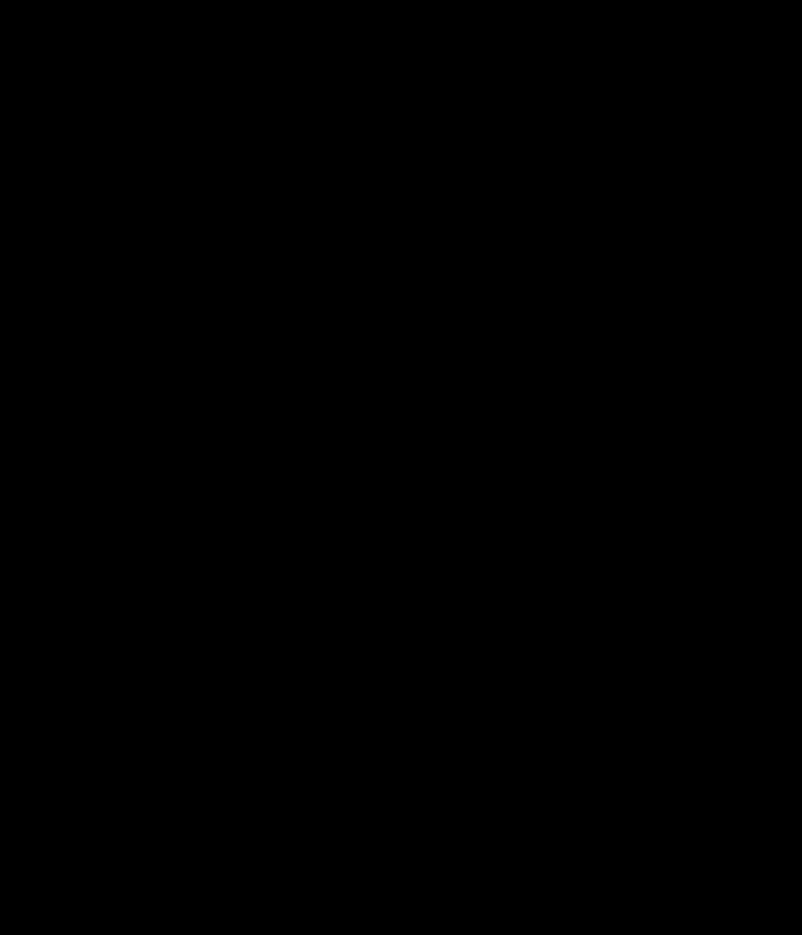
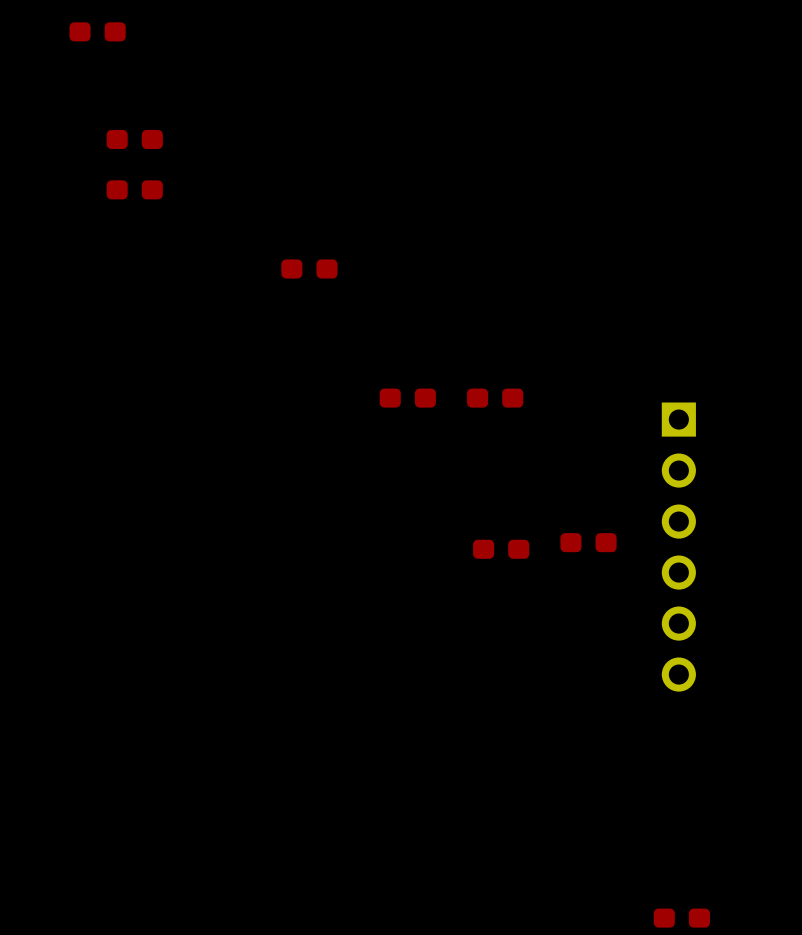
part: none -> (97, 31)
part: none -> (134, 139)
part: none -> (134, 189)
part: none -> (309, 268)
part: none -> (407, 398)
part: none -> (495, 398)
part: none -> (588, 542)
part: none -> (678, 547)
part: none -> (501, 549)
part: none -> (681, 918)

